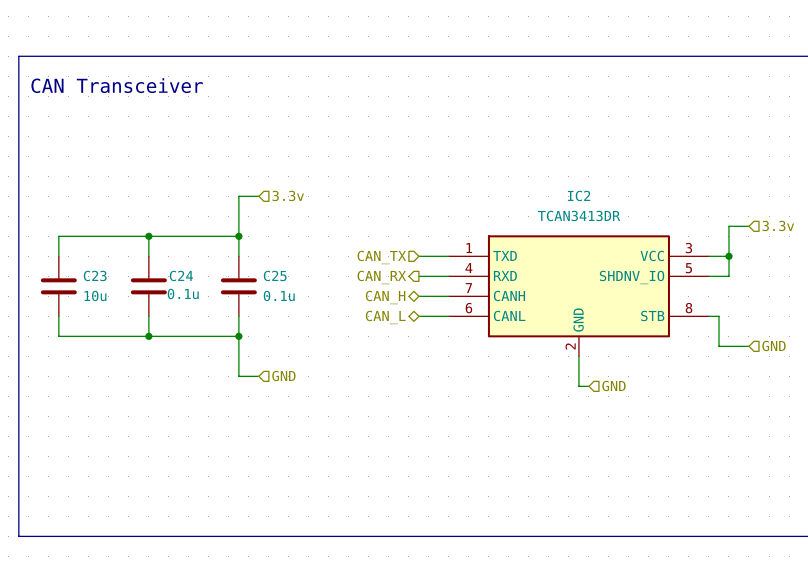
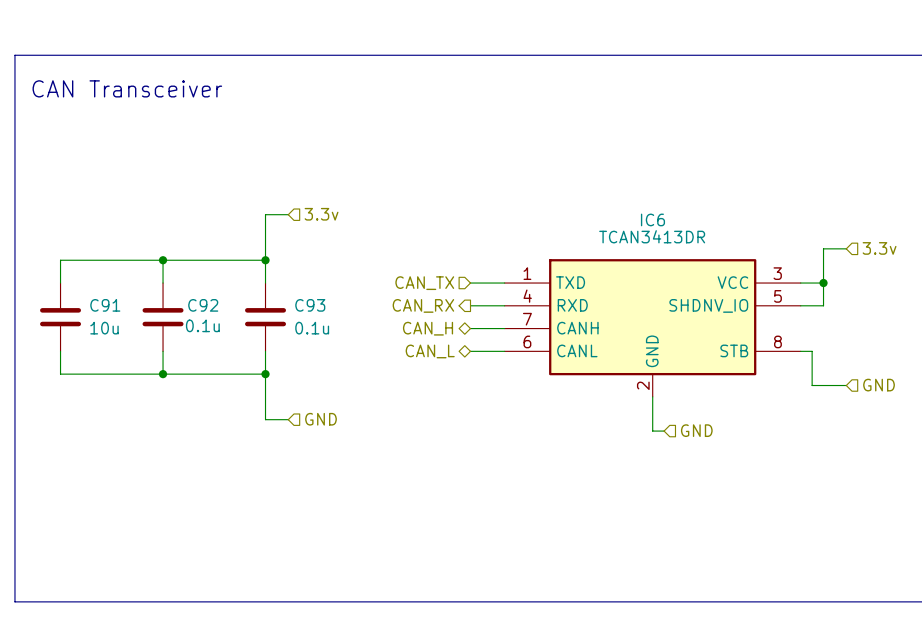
IC2 name: IC2 (579, 195) -> IC6 (652, 219)
C23 name: C23 (95, 275) -> C91 (105, 305)
C24 name: C24 (181, 275) -> C92 (203, 305)
C25 name: C25 (275, 275) -> C93 (310, 305)

